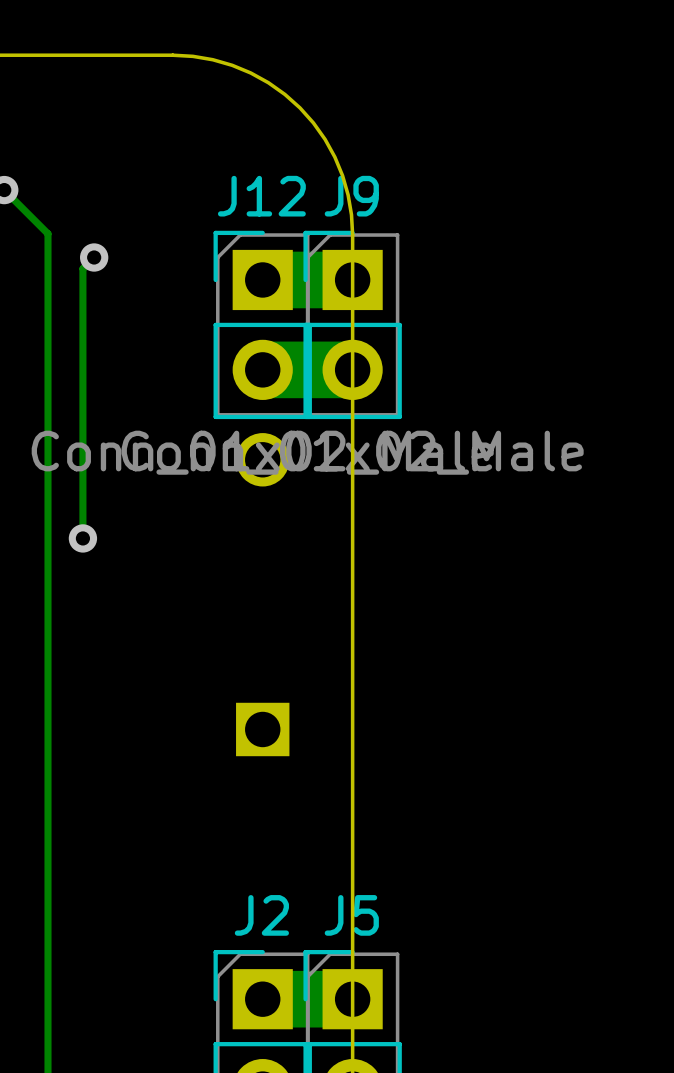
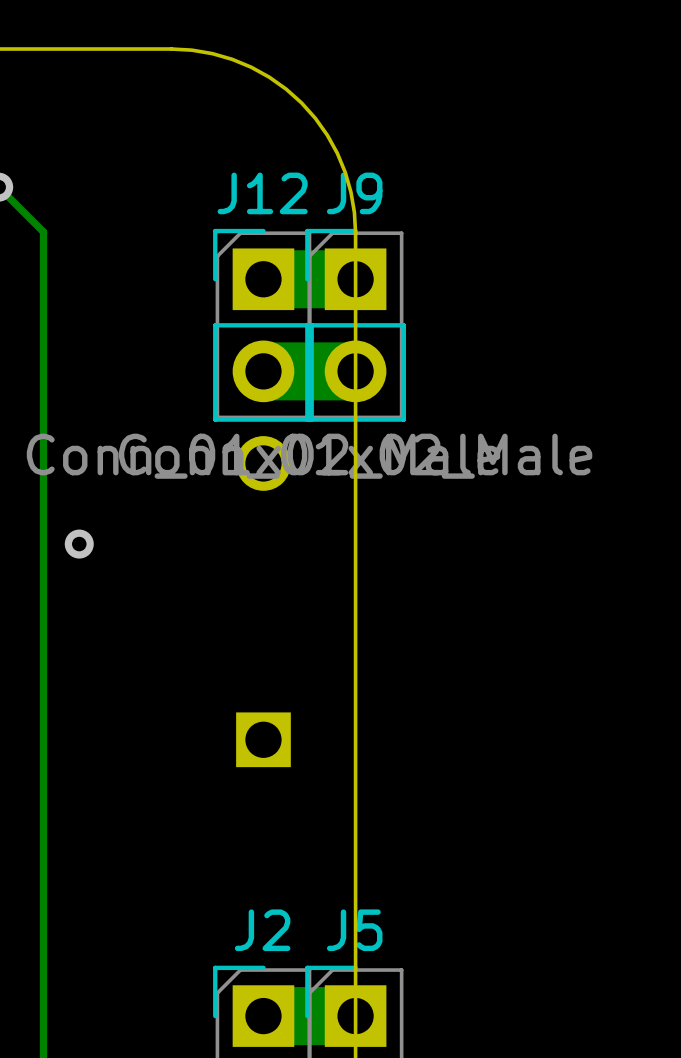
track: (94, 257) (82, 268) (82, 538) -> none
via: (94, 257) -> none

